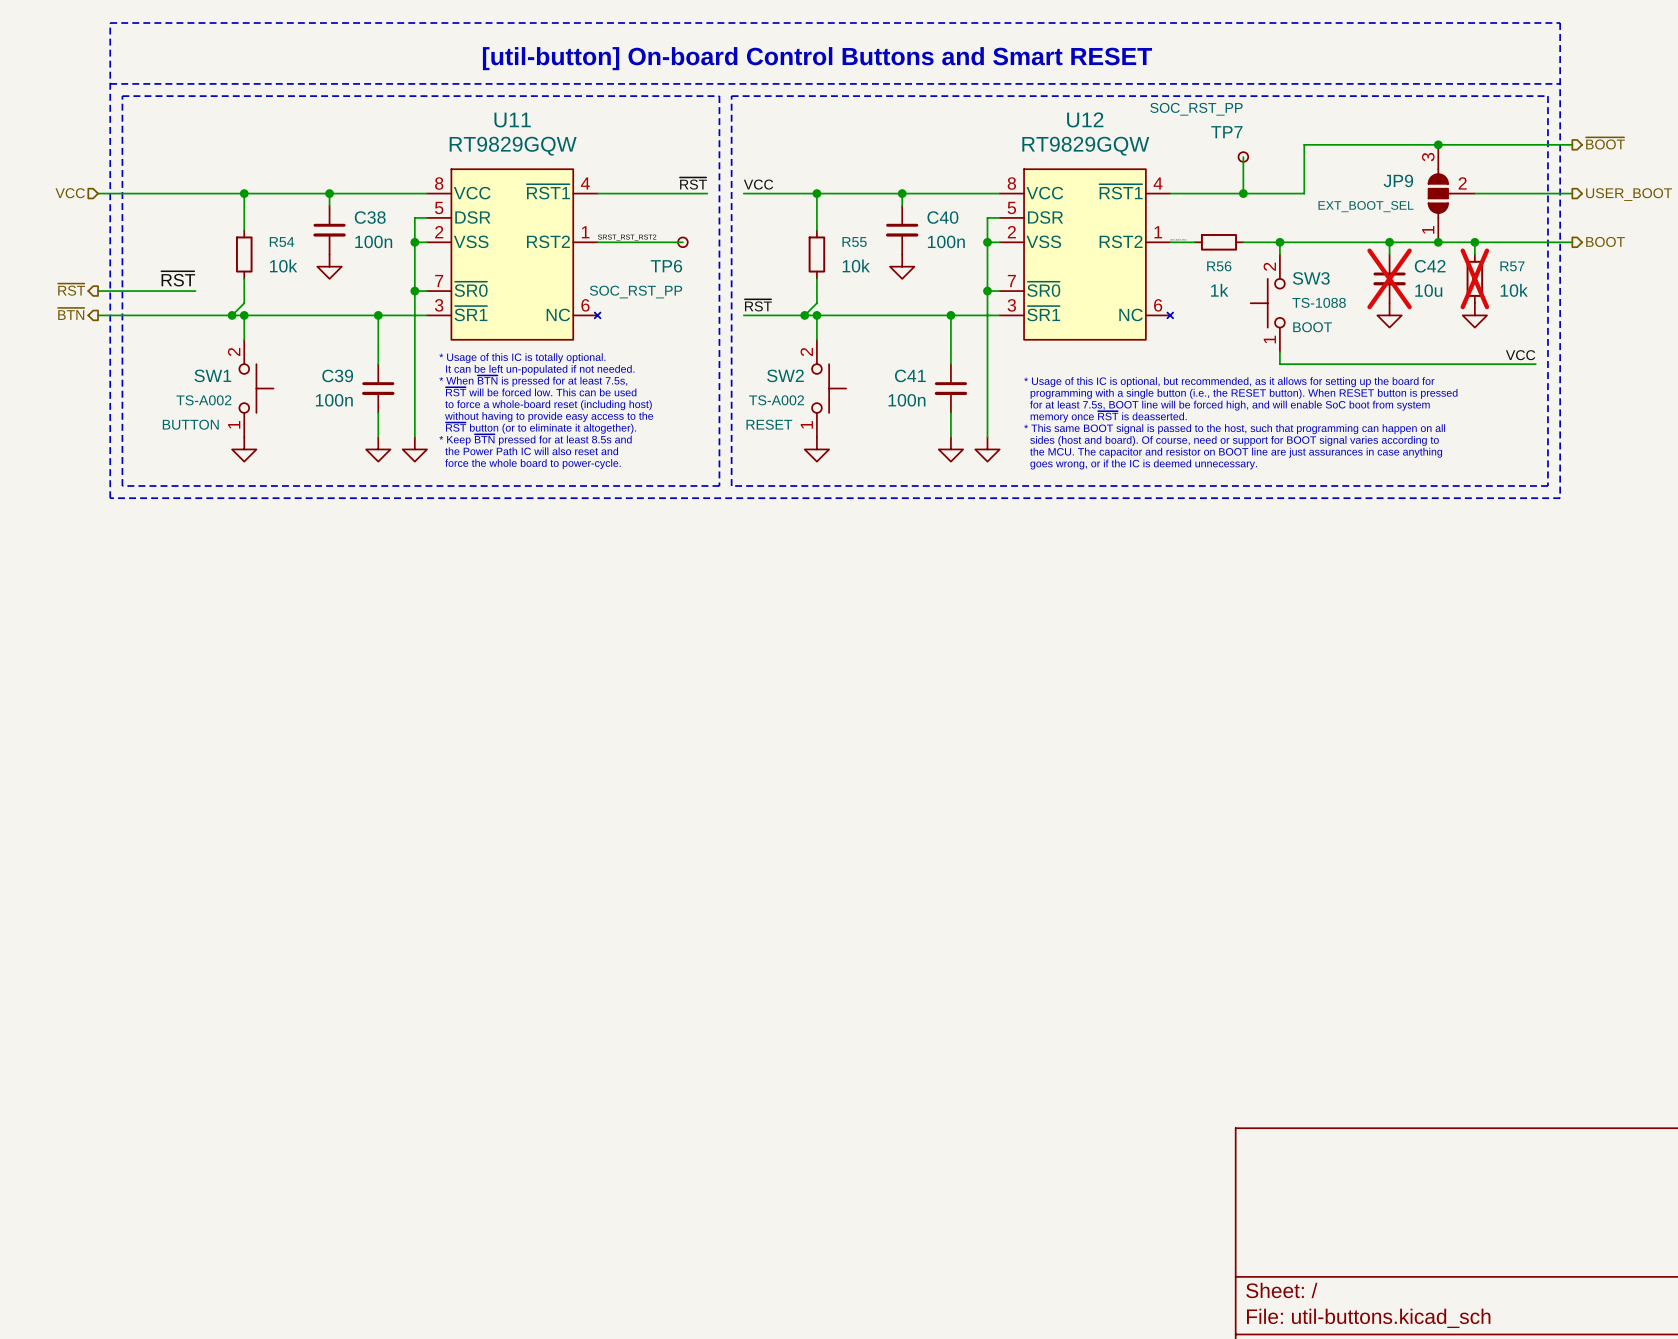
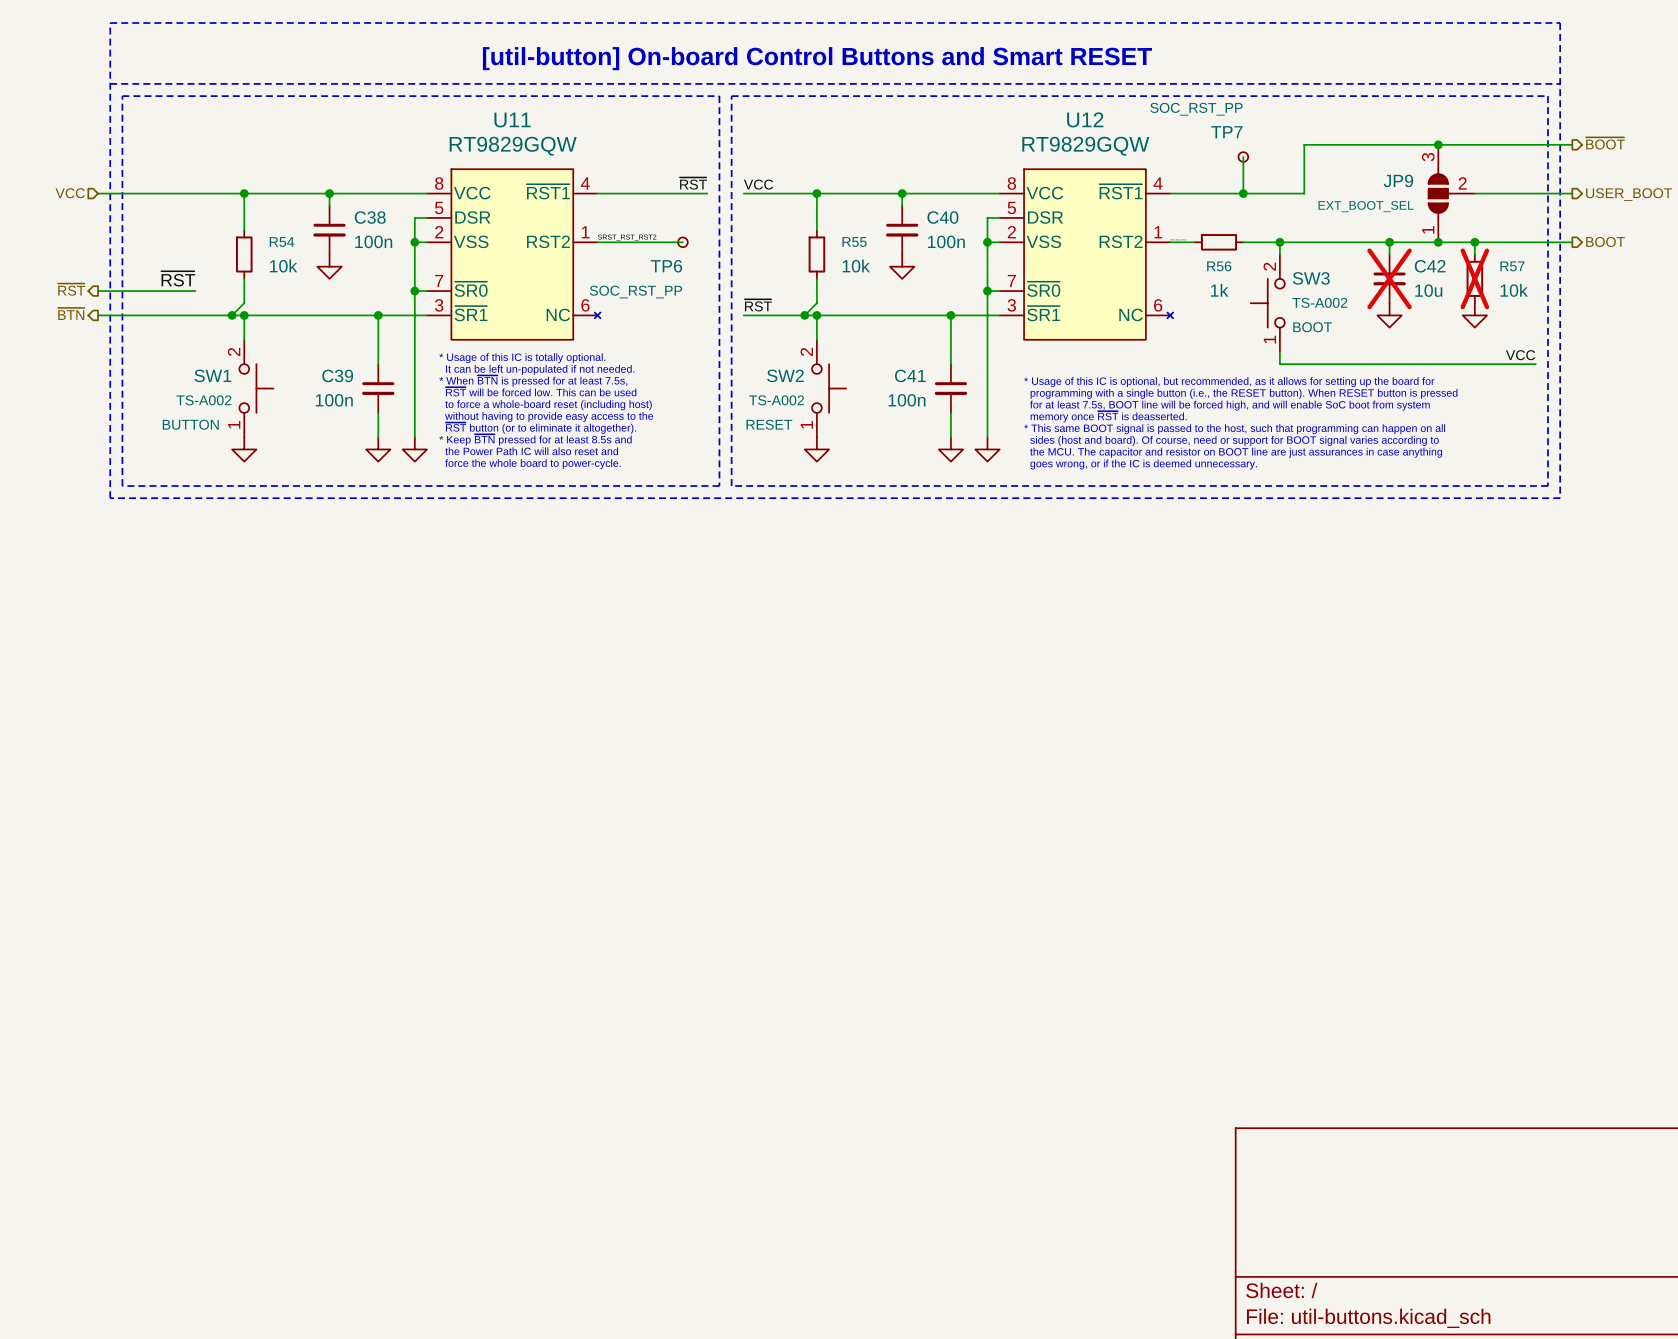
SW3 value: TS-1088 (1319, 302) -> TS-A002 (1319, 302)

